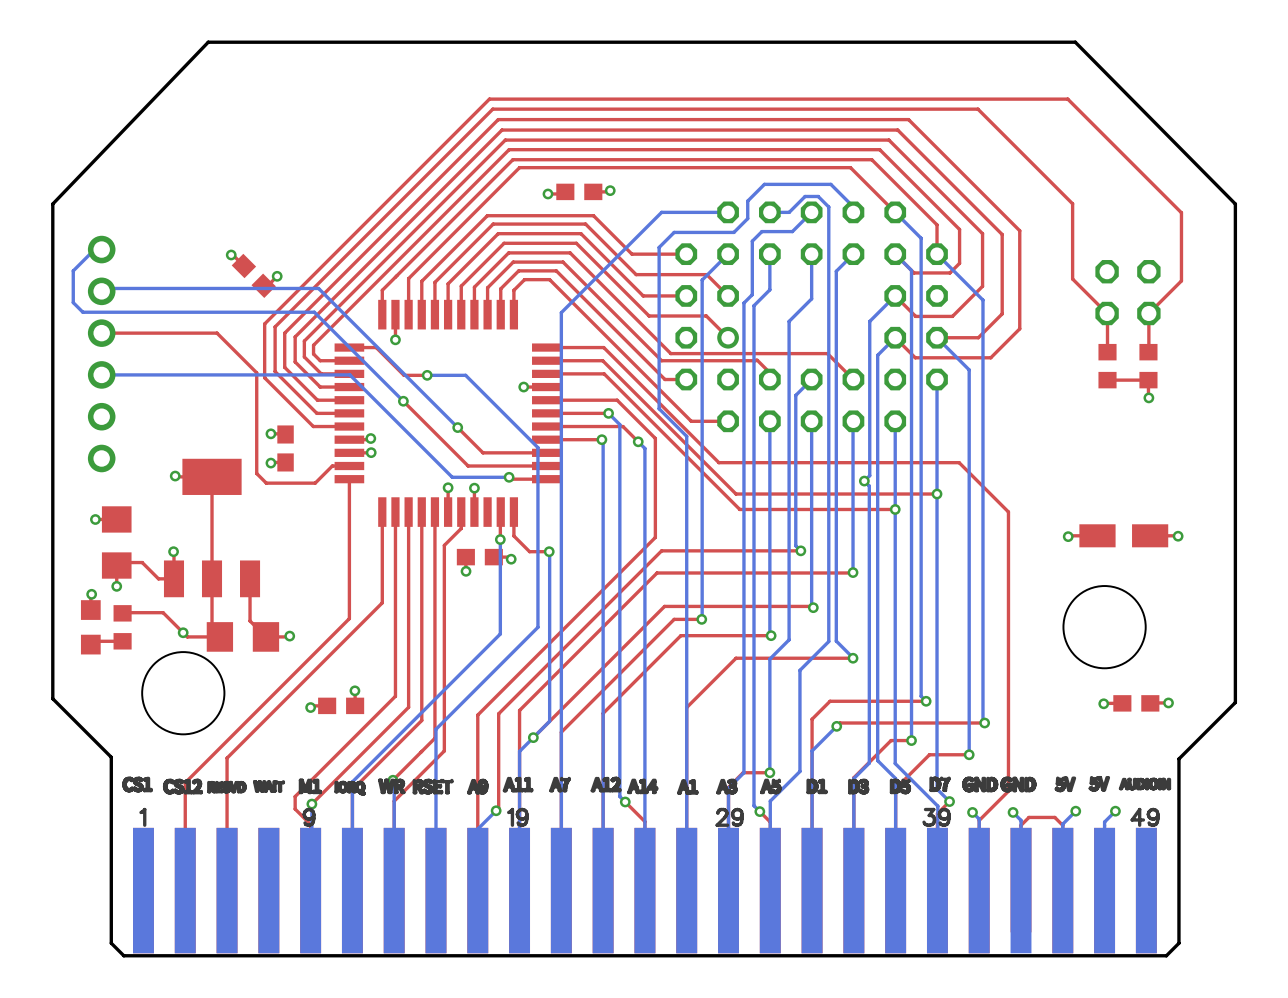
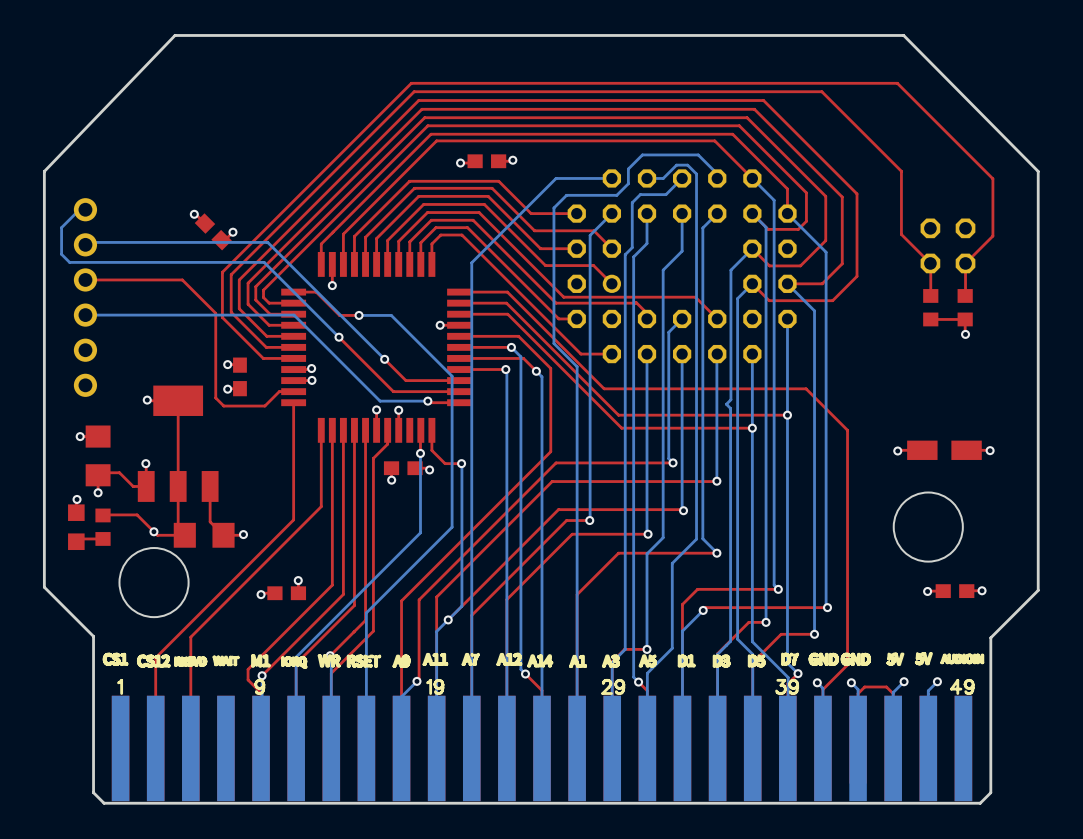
via: (864, 481) -> none

